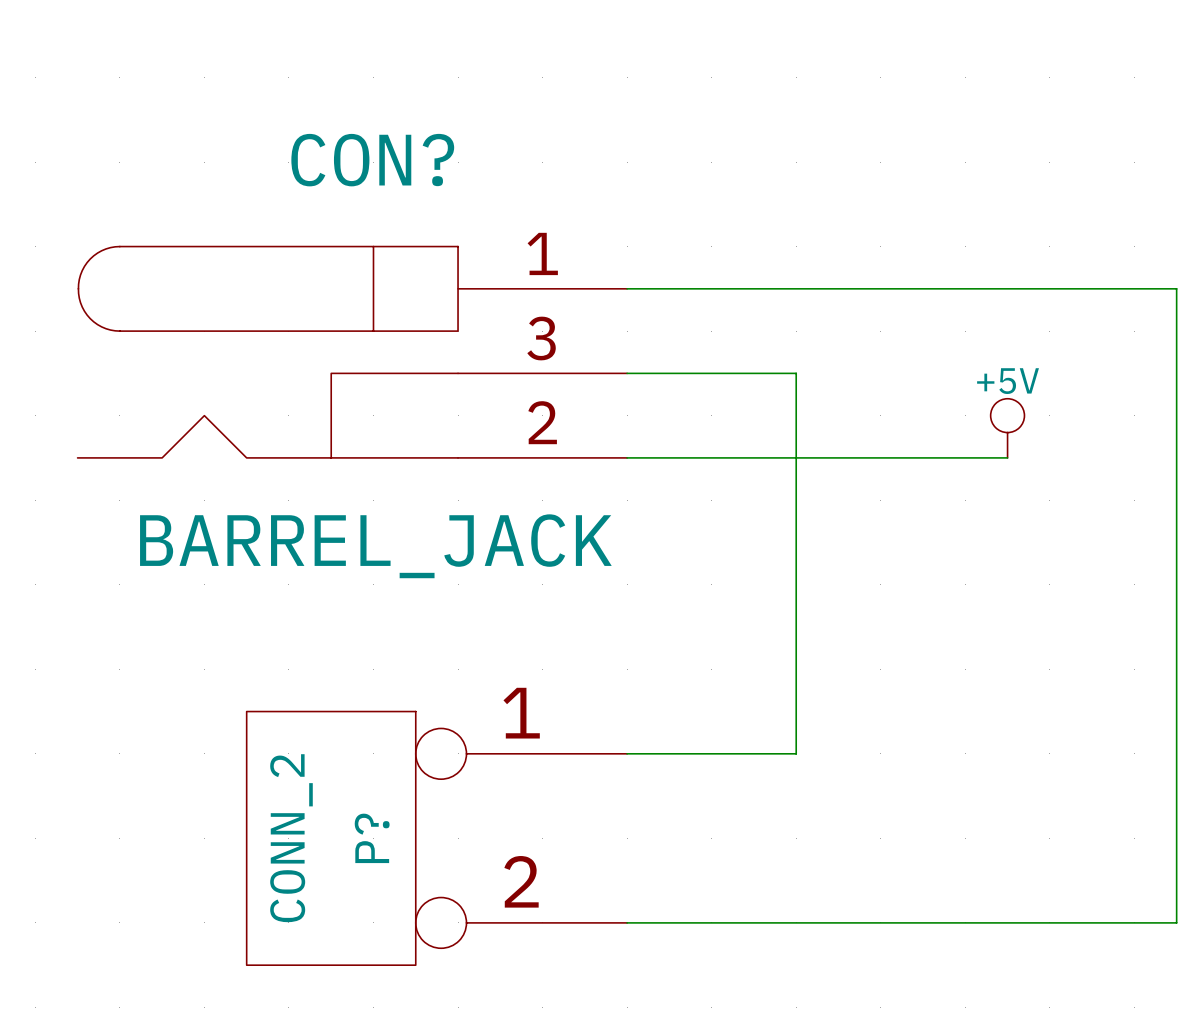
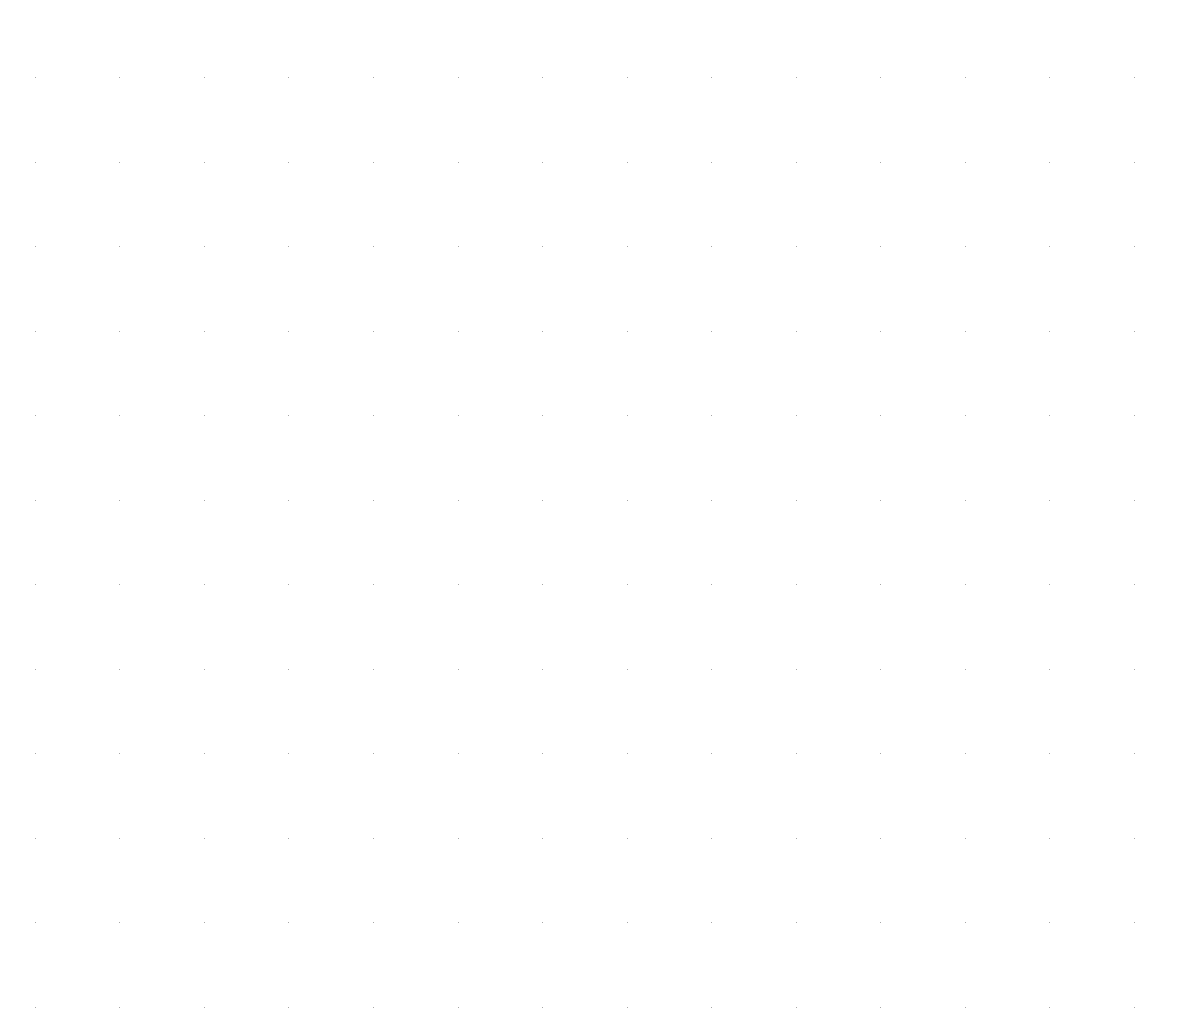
wire: (627, 288) (1176, 288) (1176, 922) (627, 922) -> none
CON?: BARREL_JACK (352, 352) -> none
wire: (627, 373) (796, 373) (796, 753) (627, 753) -> none
power symbol: +5V (1007, 428) -> none
wire: (627, 457) (1007, 457) -> none
P?: CONN_2 (436, 838) -> none

